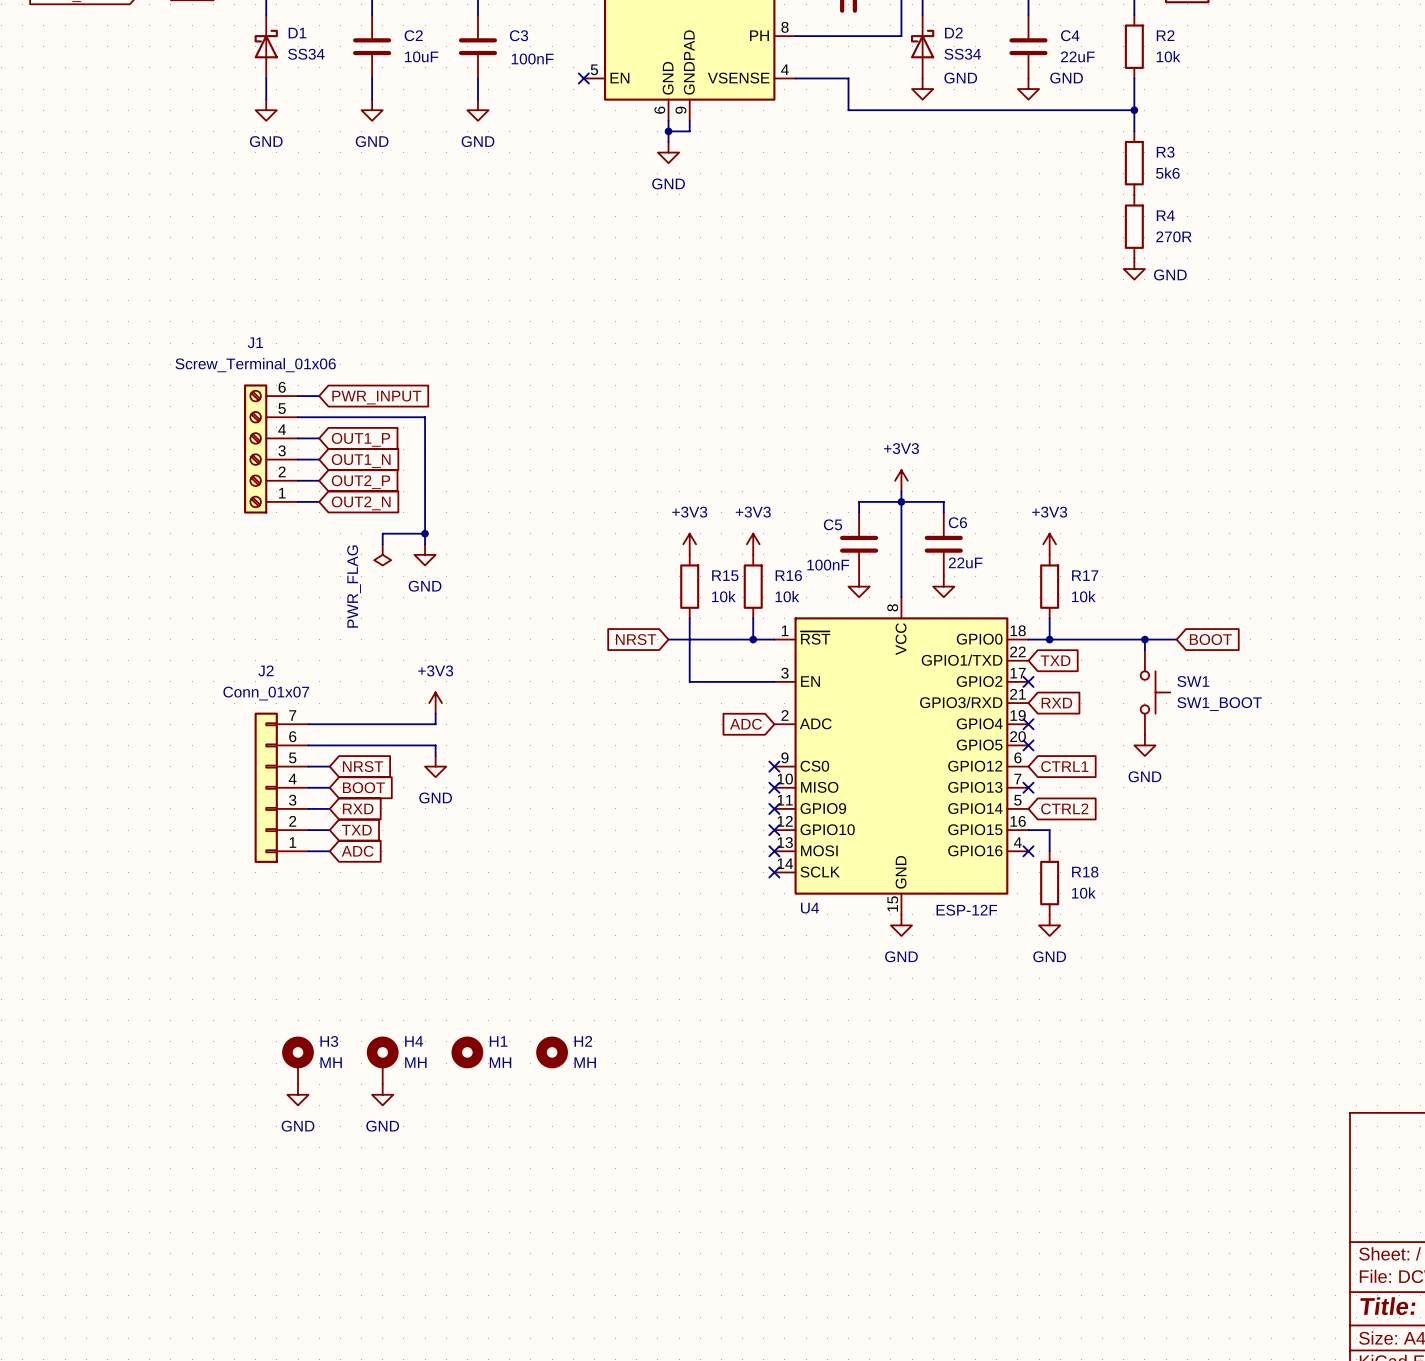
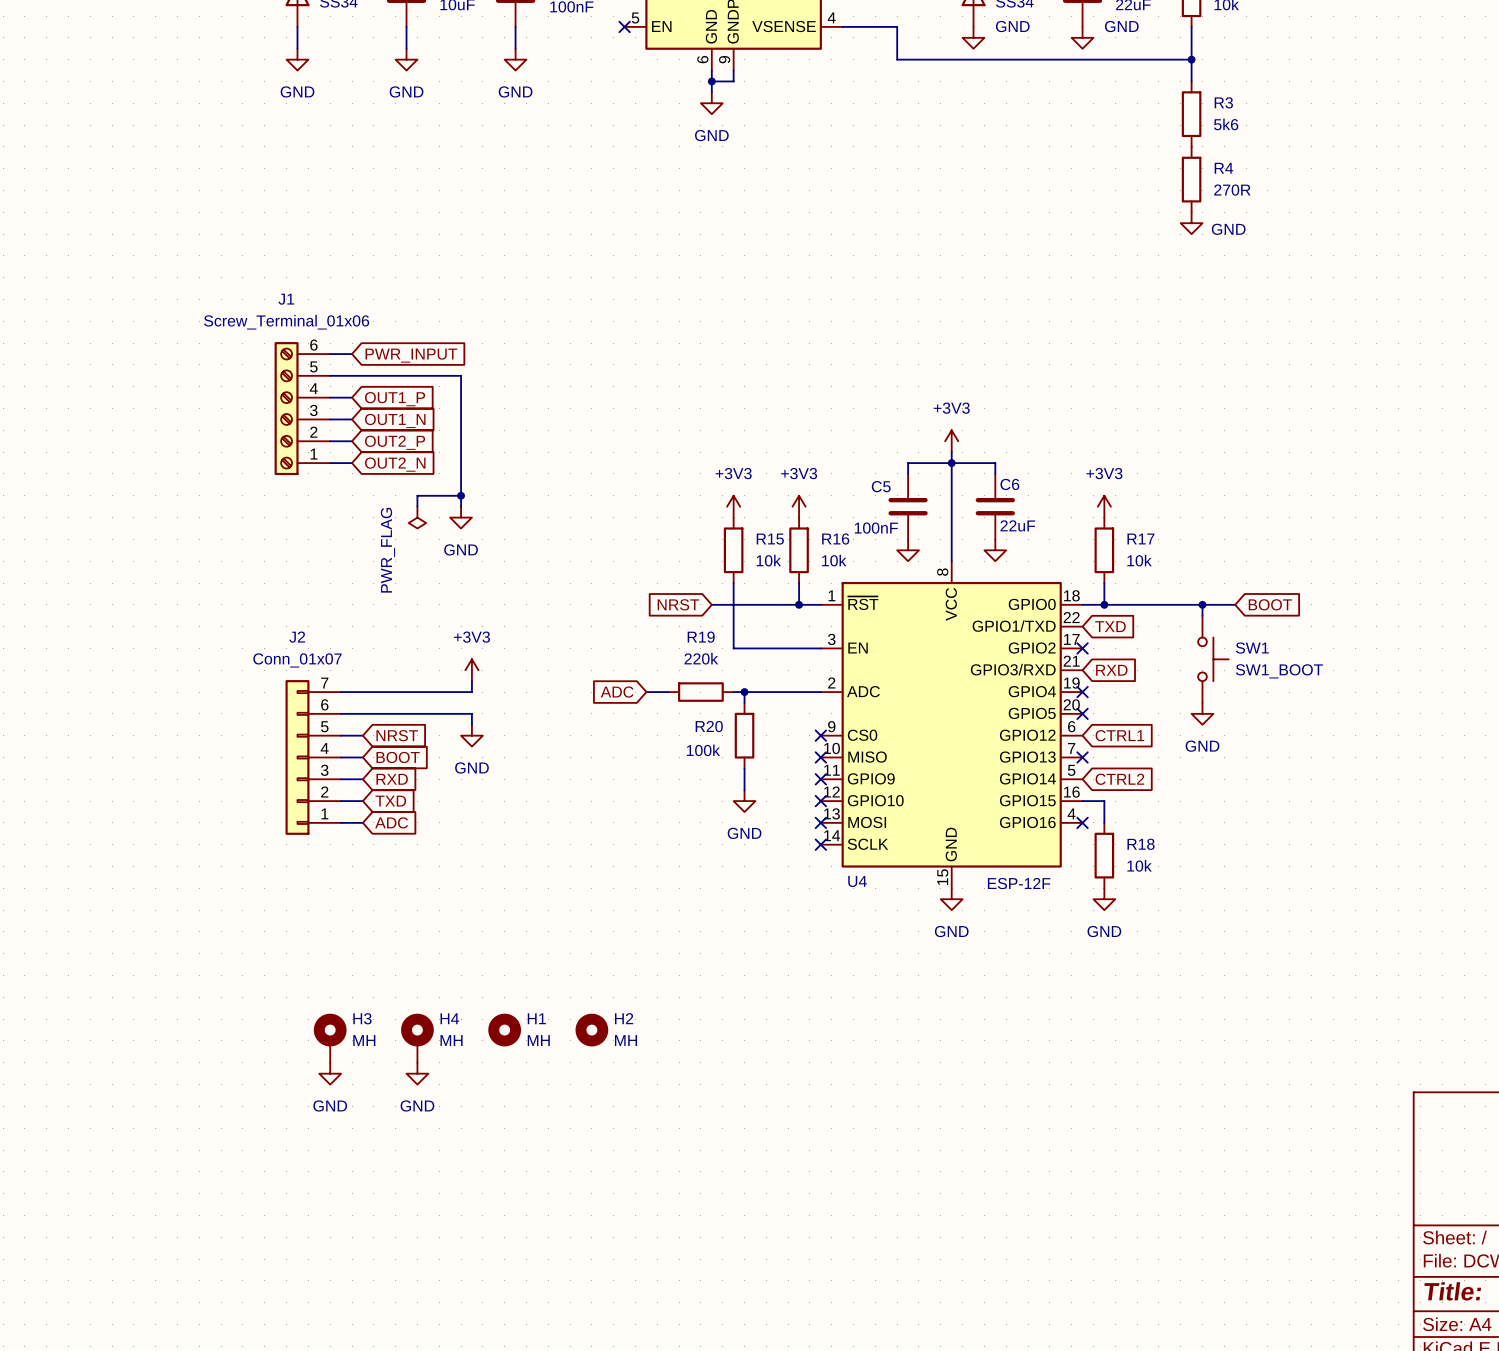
wire: none -> (646, 692) (668, 692)
R19: none -> 220k (700, 692)
wire: none -> (733, 692) (820, 692)
wire: none -> (744, 692) (744, 702)
junction: none -> (744, 692)
global label position: ADC (745, 724) -> ADC (617, 692)
R20: none -> 100k (744, 735)
wire: none -> (744, 768) (744, 790)
power symbol: none -> GND (744, 801)

